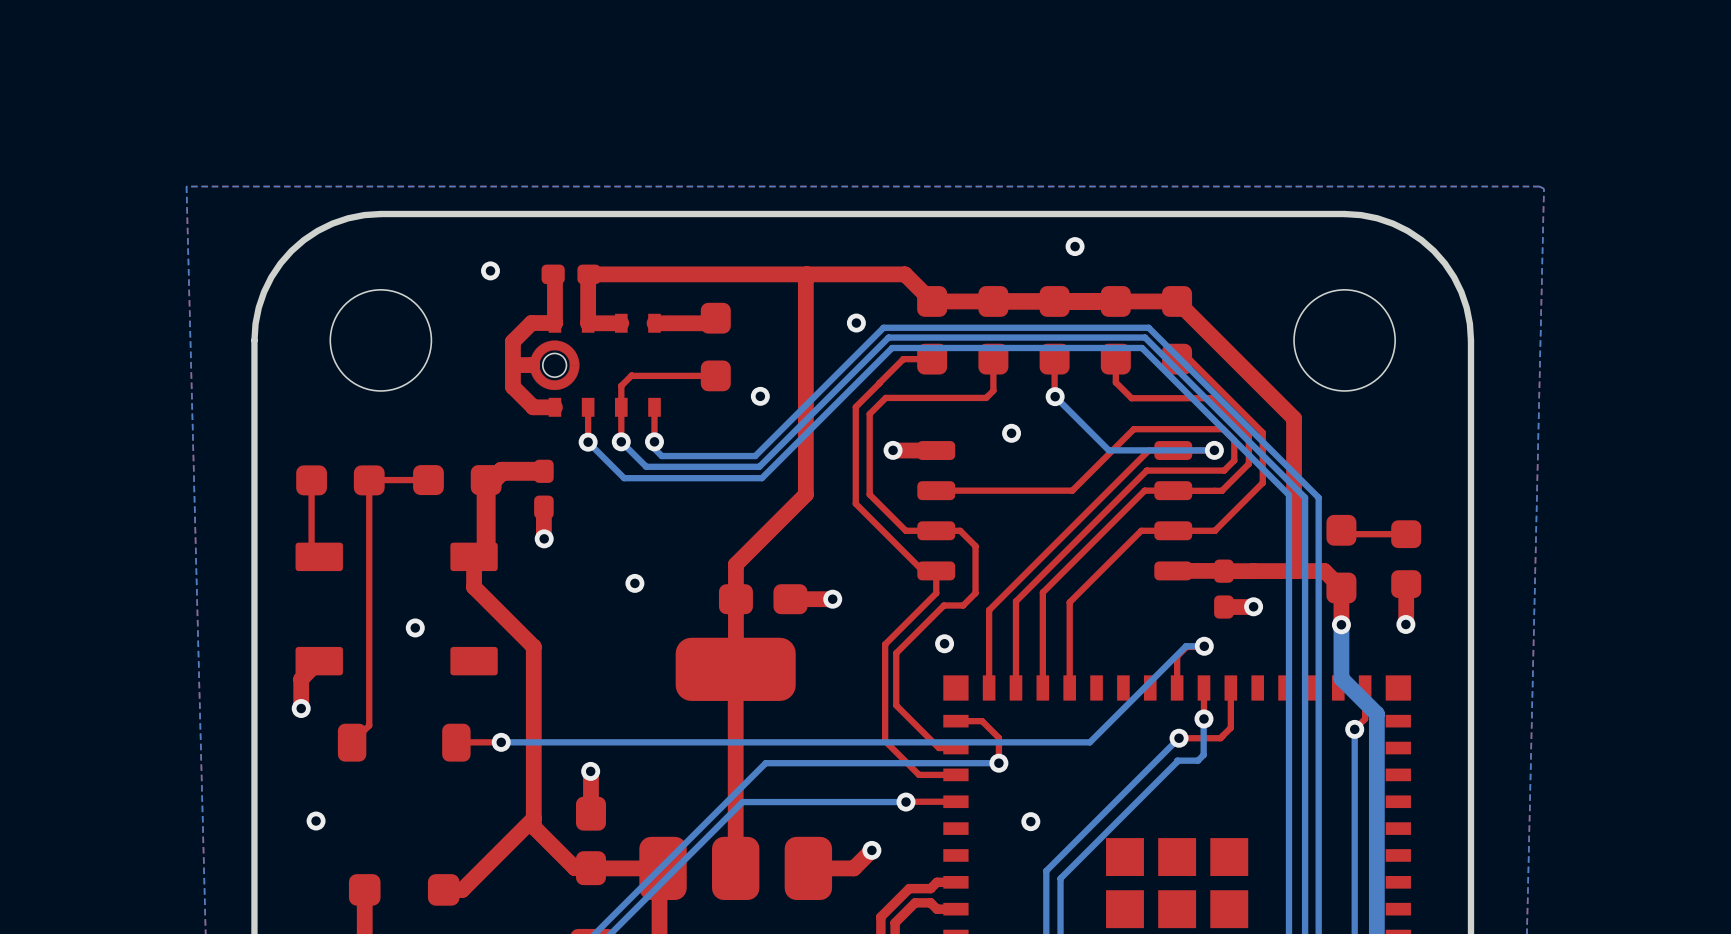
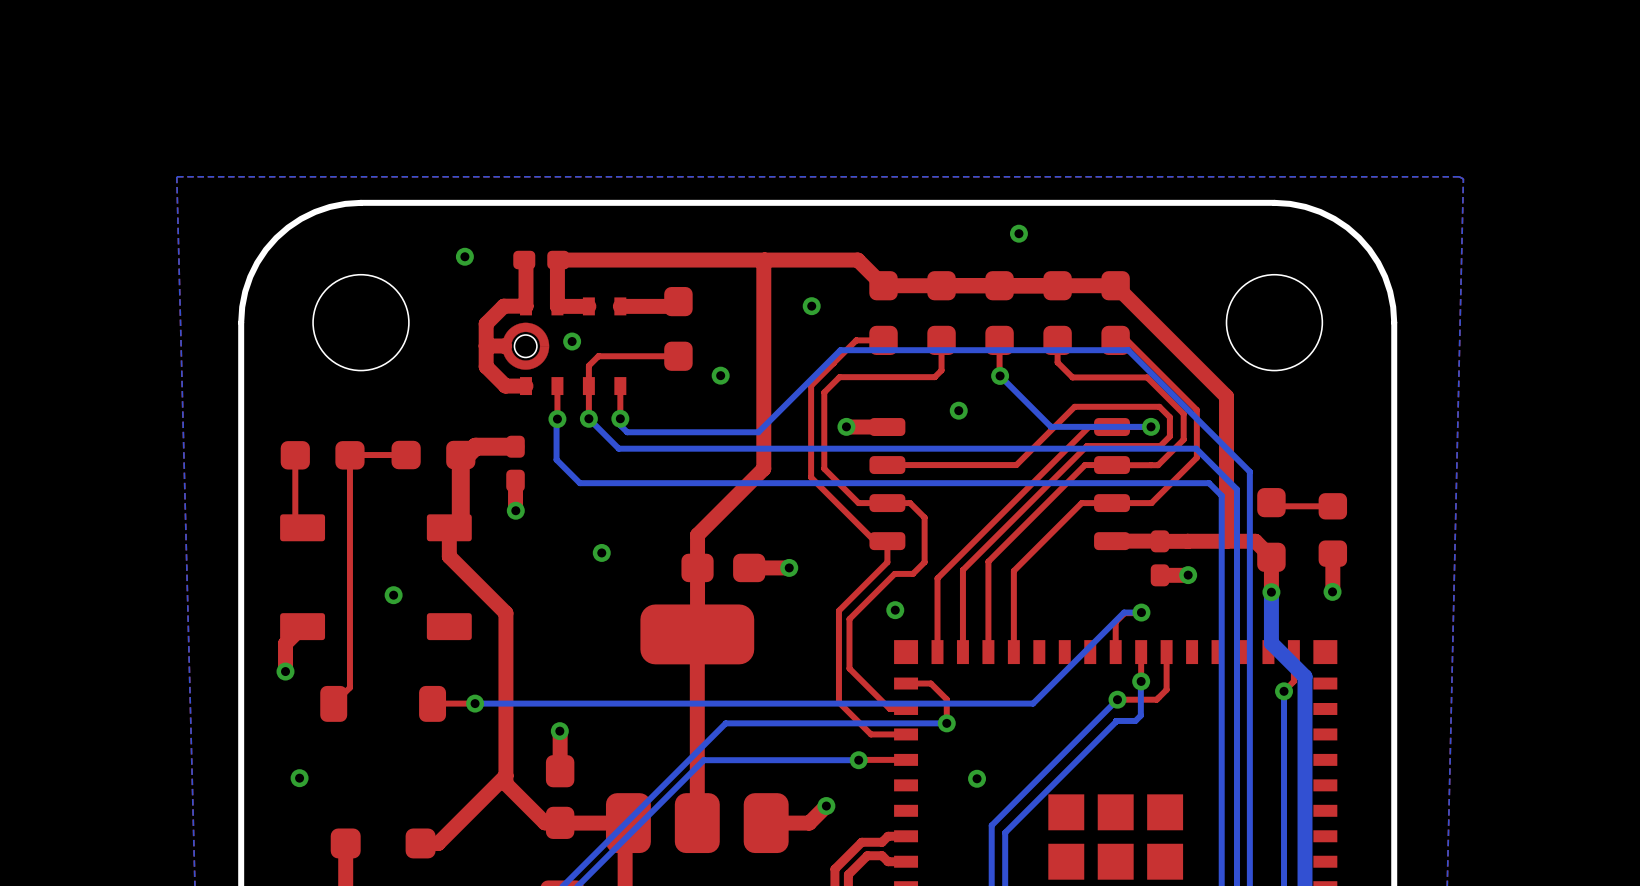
via: none -> (572, 341)
bottom track: (1190, 369) (1148, 327) (883, 327) (755, 456) -> (1128, 350) (840, 350) (758, 432) (715, 432)
bottom track: (588, 442) (624, 478) (761, 478) (892, 347) (1142, 347) (1288, 494) (1288, 523) -> (556, 419) (556, 459) (579, 483) (1209, 483) (1221, 495)
bottom track: (646, 466) (759, 466) (888, 337) (1145, 337) (1305, 497) (1305, 516) -> (612, 442) (618, 448) (1196, 448) (1236, 489)

